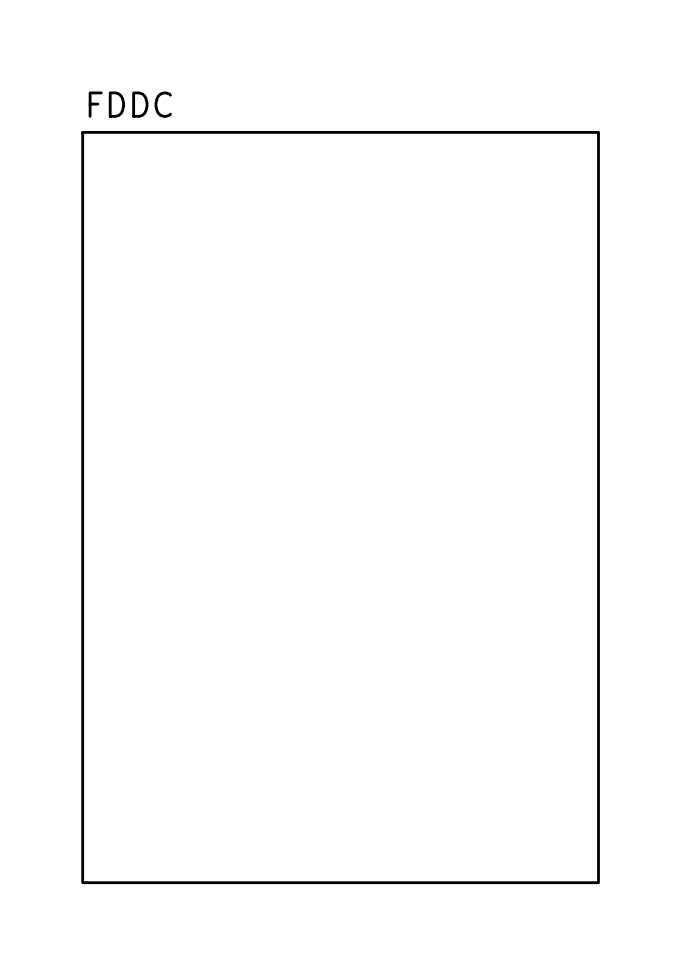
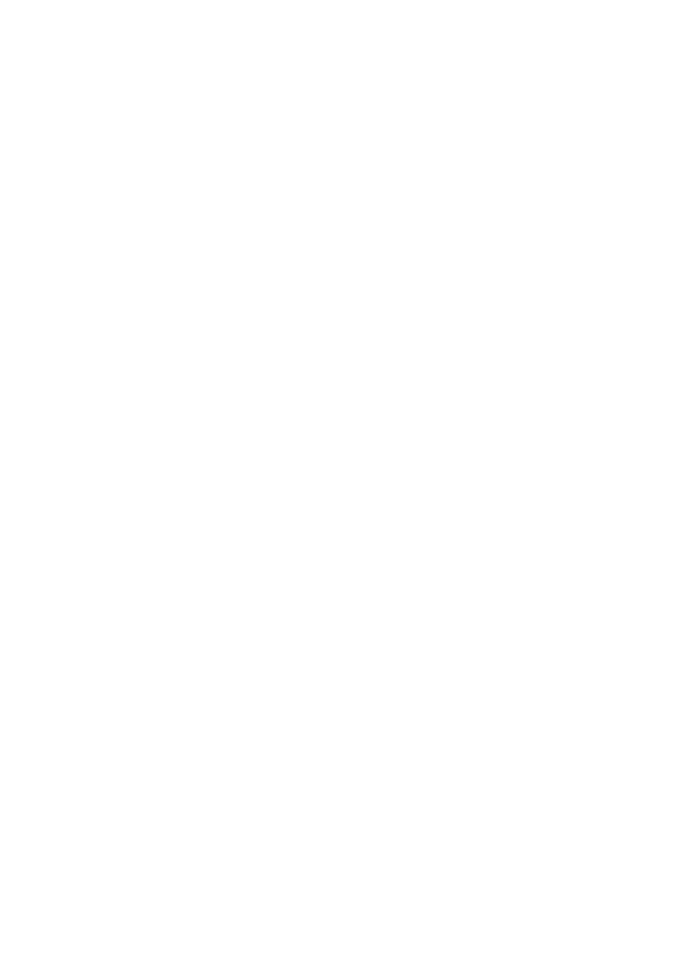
sheet FDDC: (340, 507) -> none

